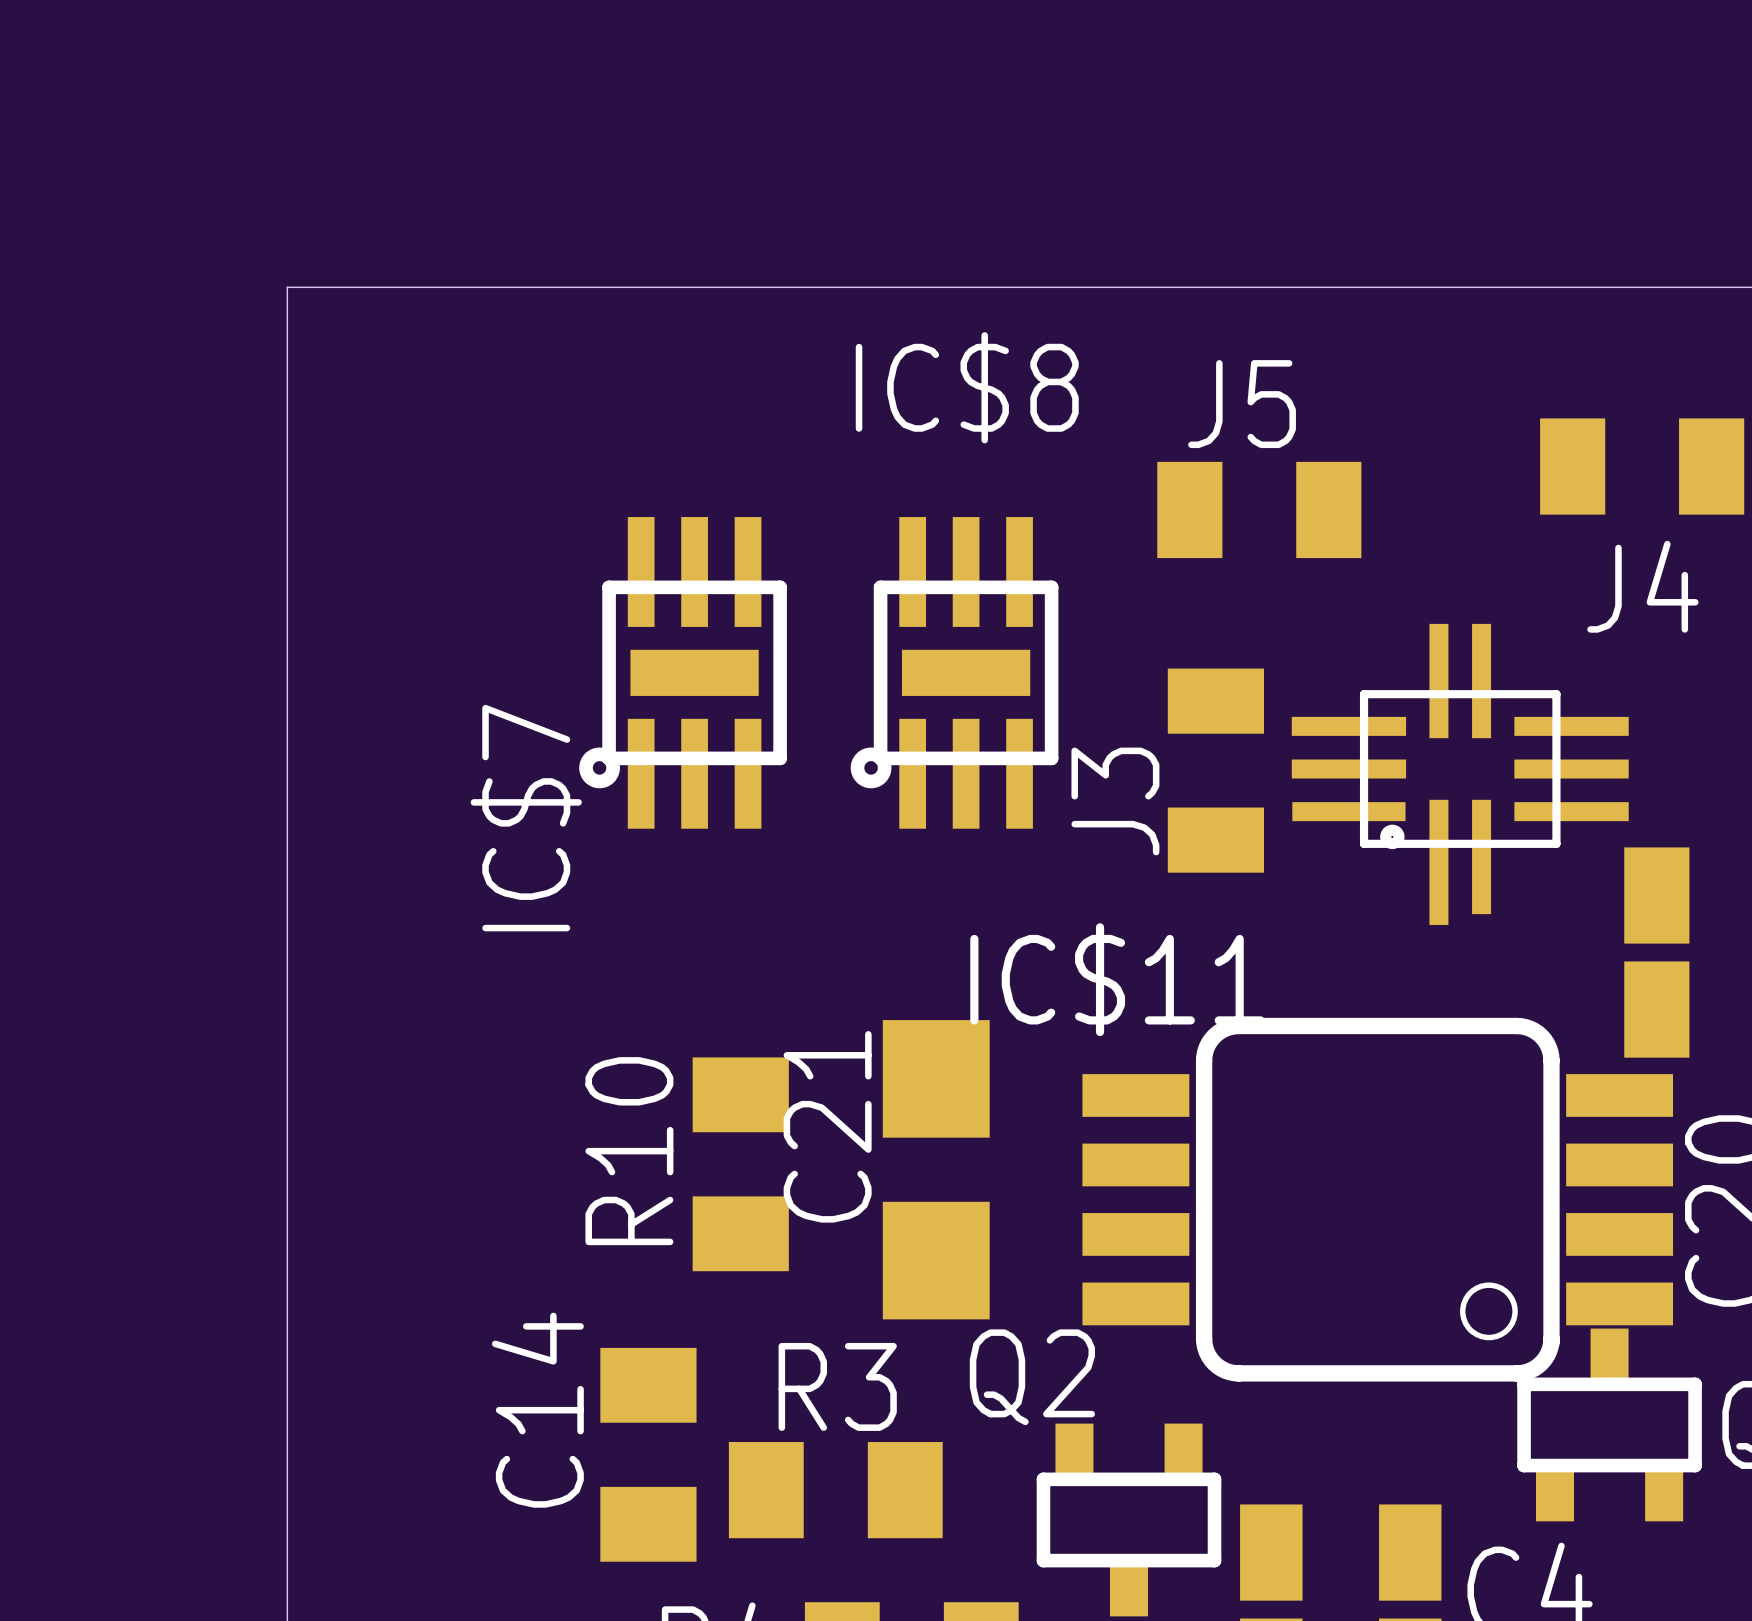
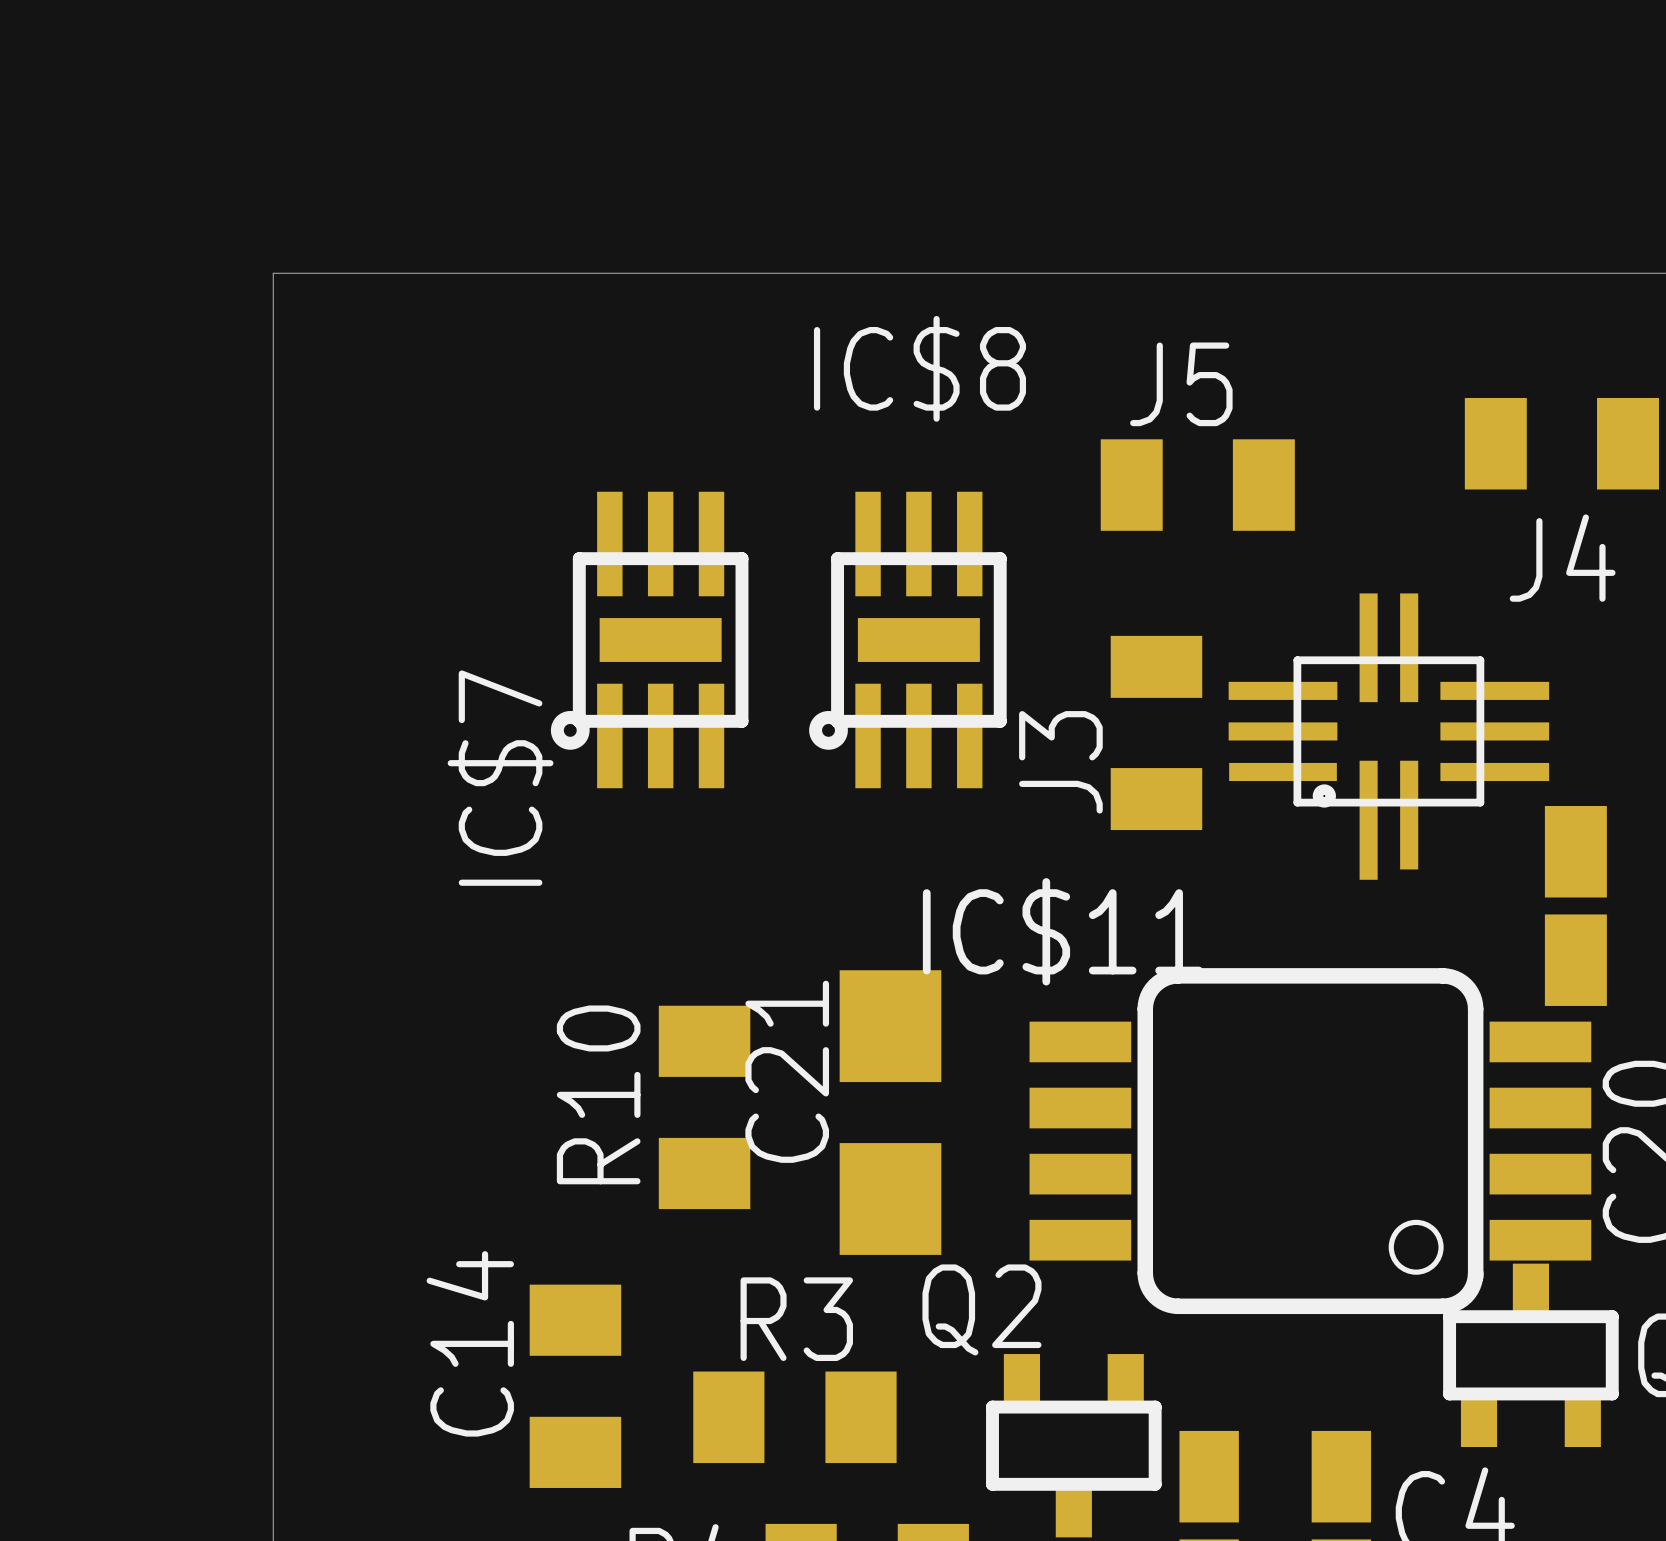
C14 position: (648, 1454) -> (575, 1386)

